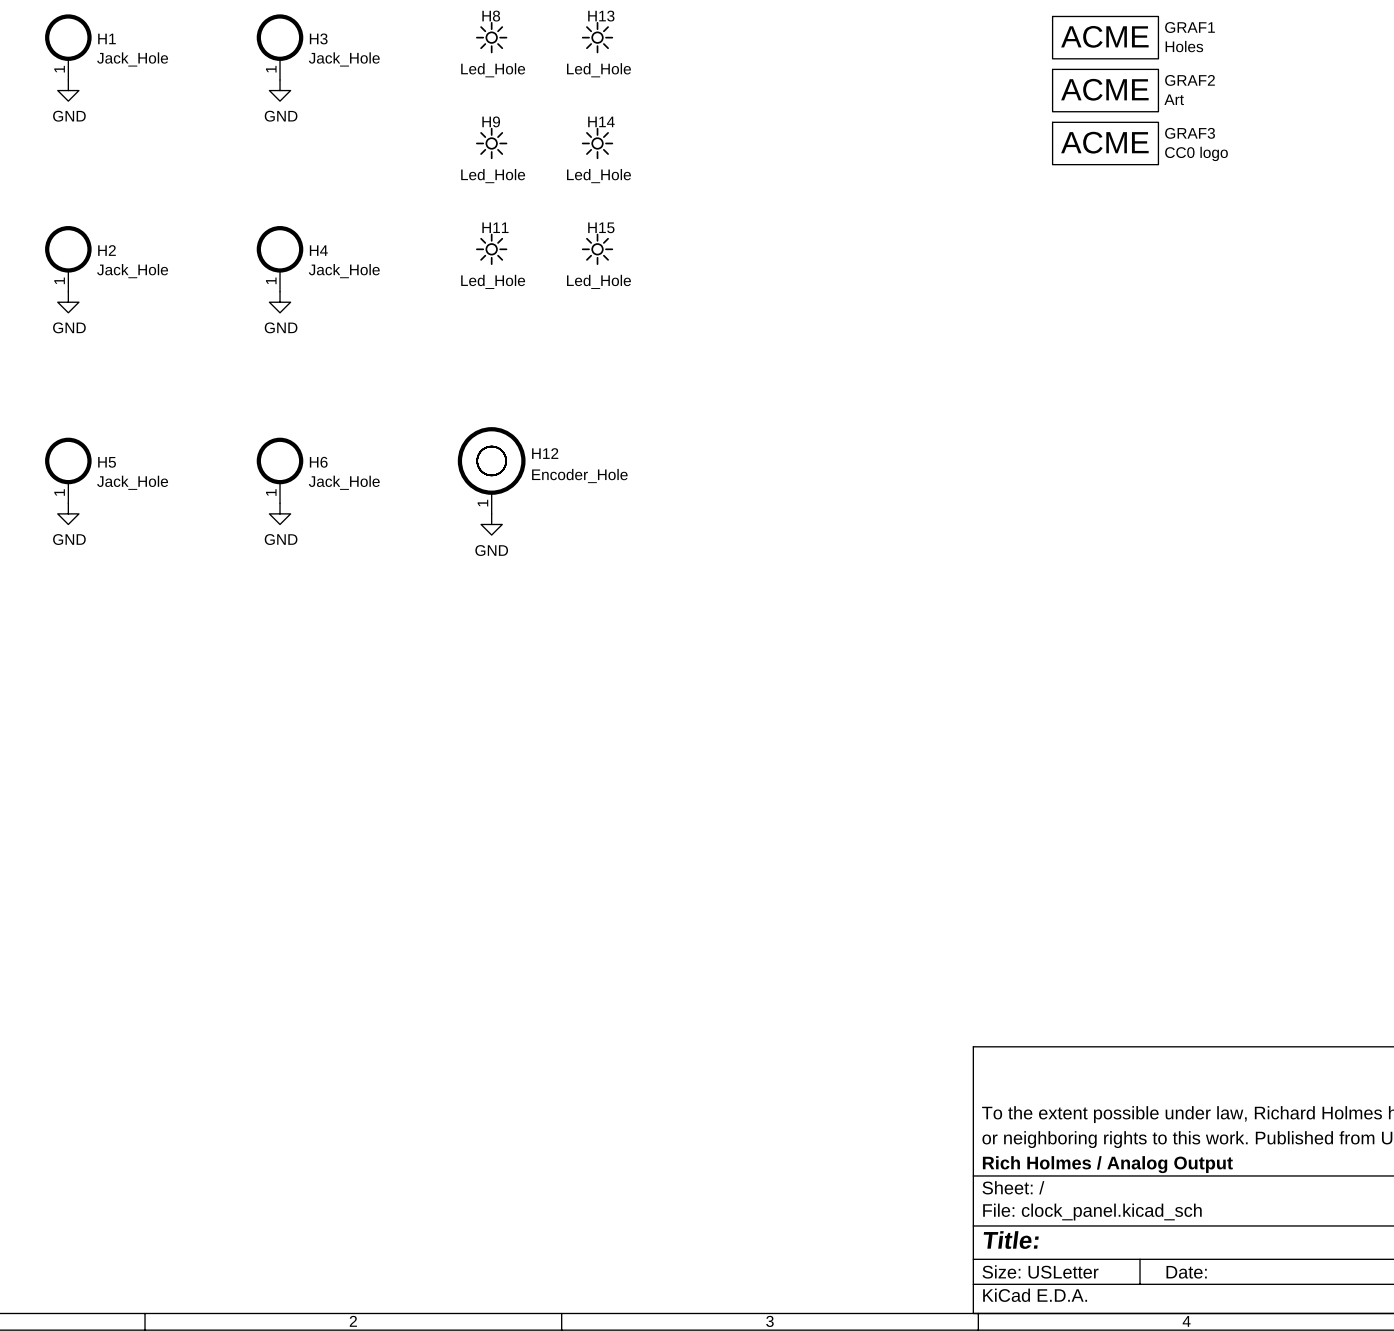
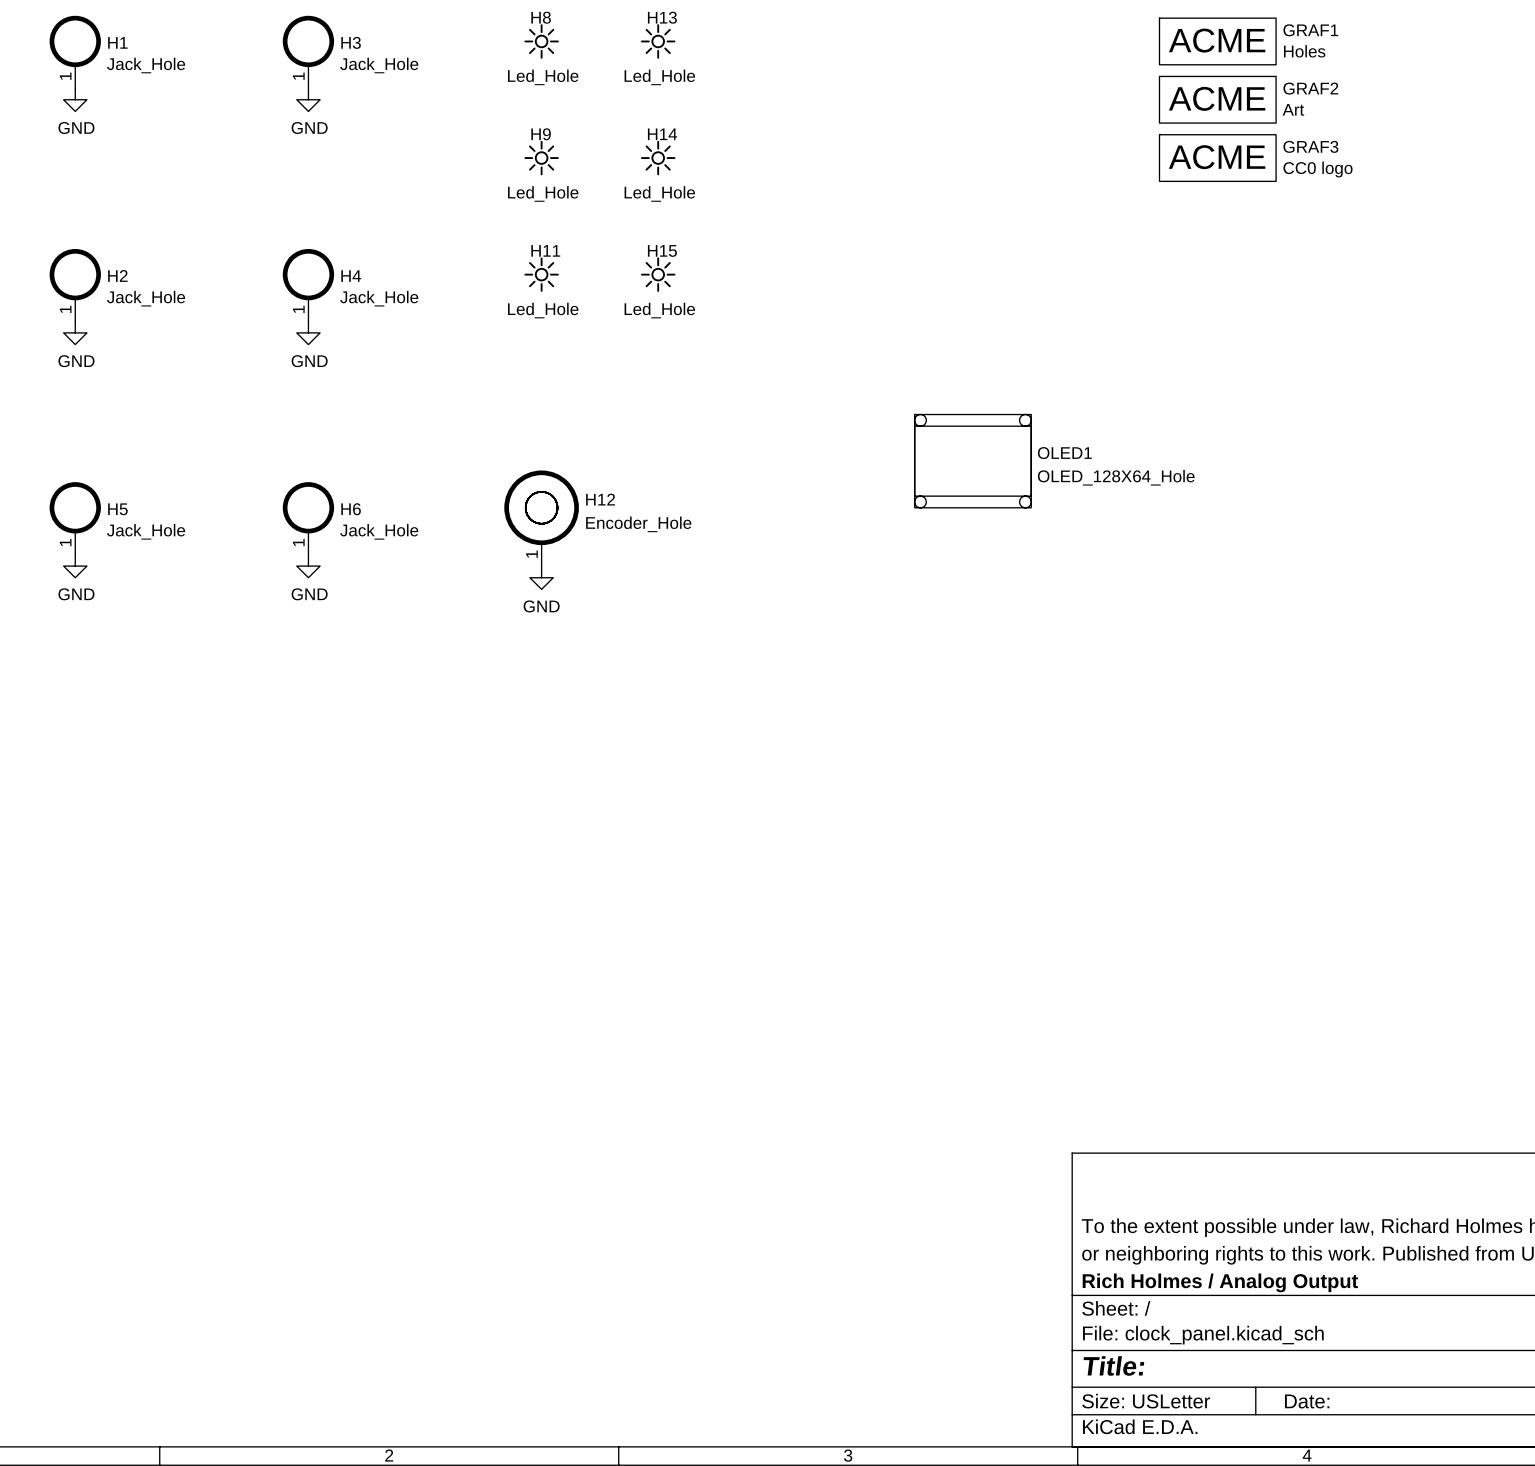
OLED1: none -> OLED_128X64_Hole (972, 461)

